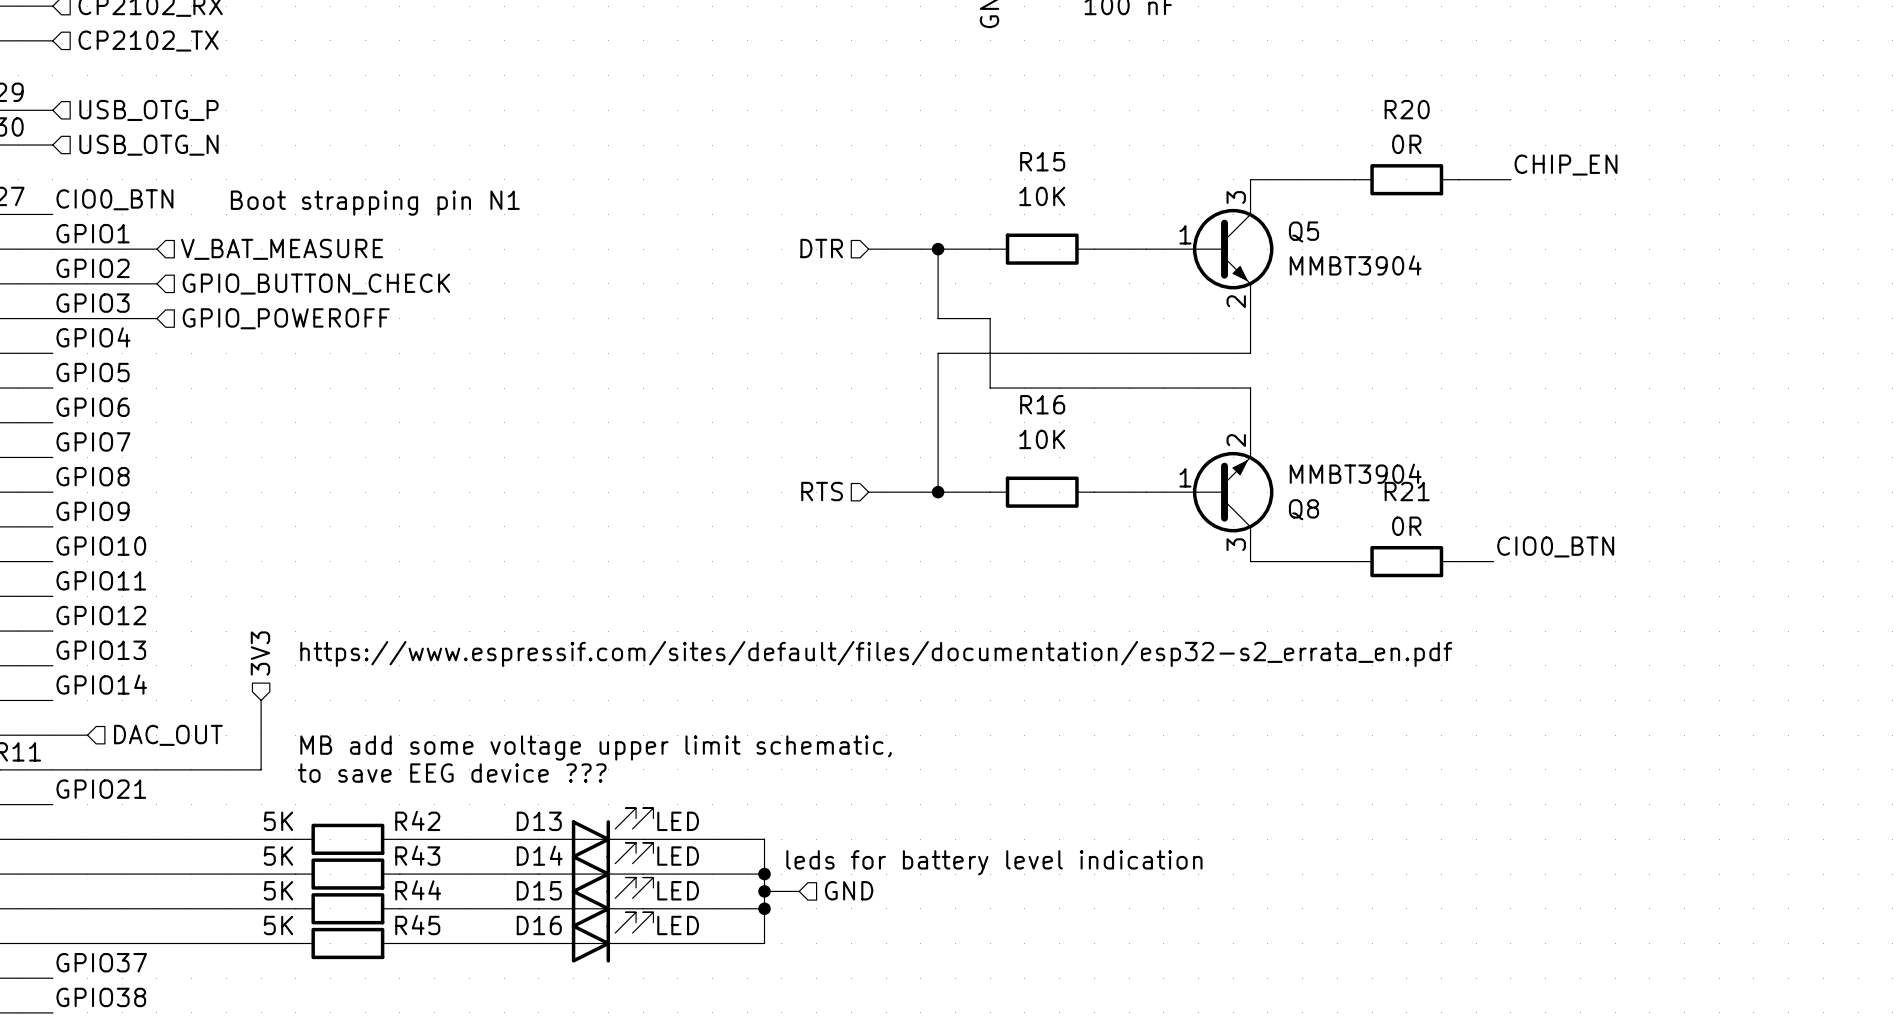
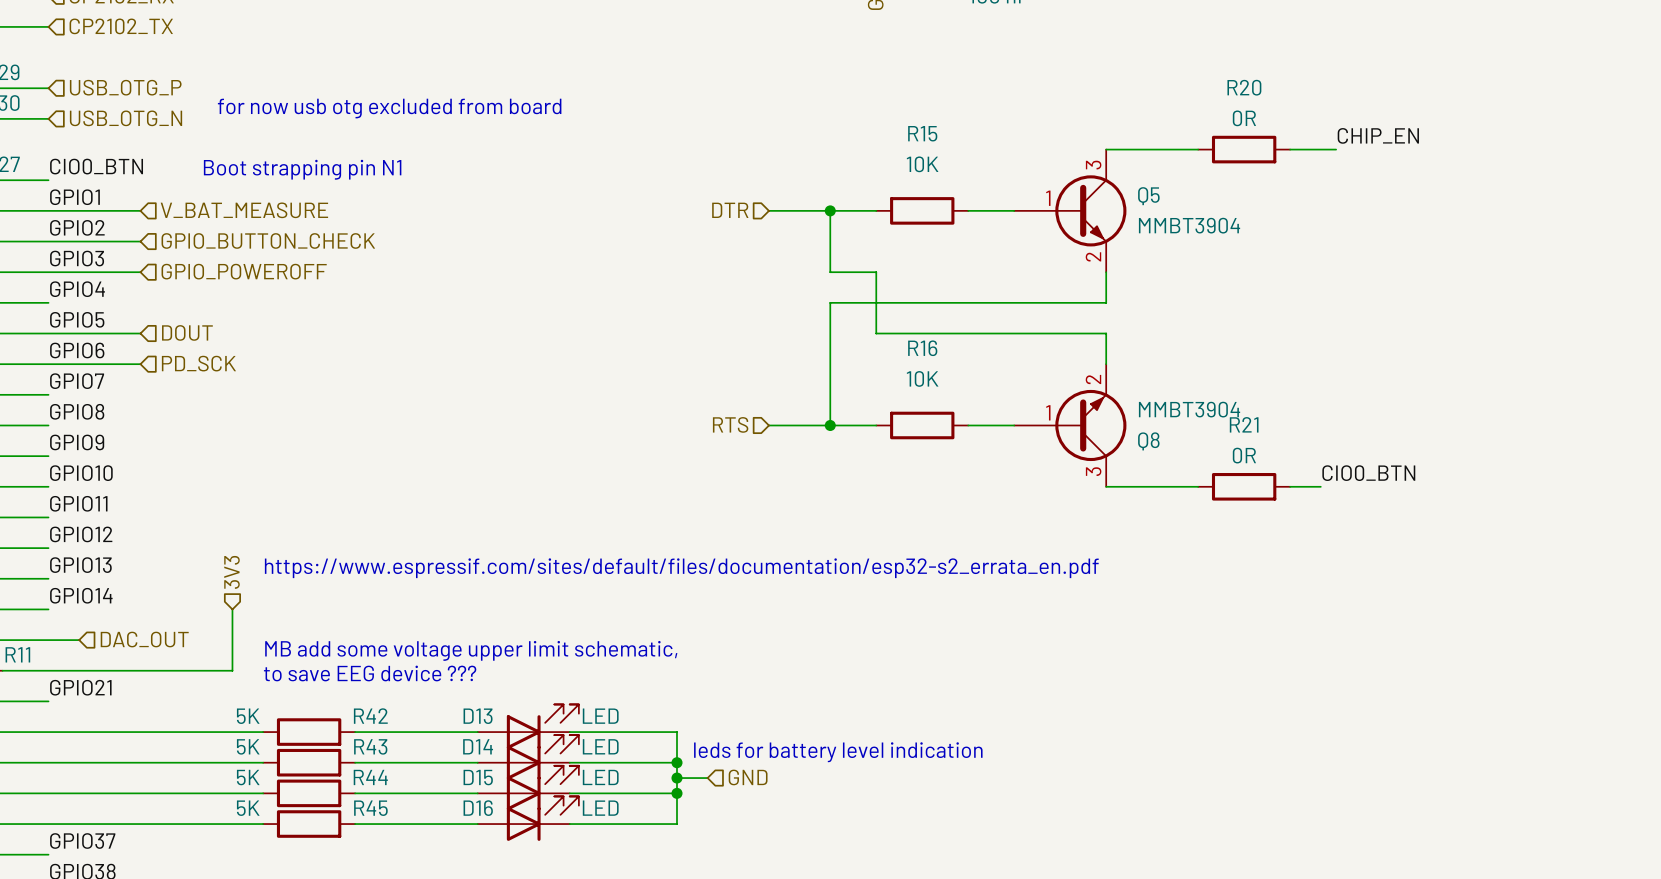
text: none -> for now usb otg excluded from board (389, 108)
hierarchical label: none -> DOUT (187, 332)
wire: none -> (48, 333) (140, 333)
wire: none -> (48, 364) (140, 364)
hierarchical label: none -> PD_SCK (198, 363)

